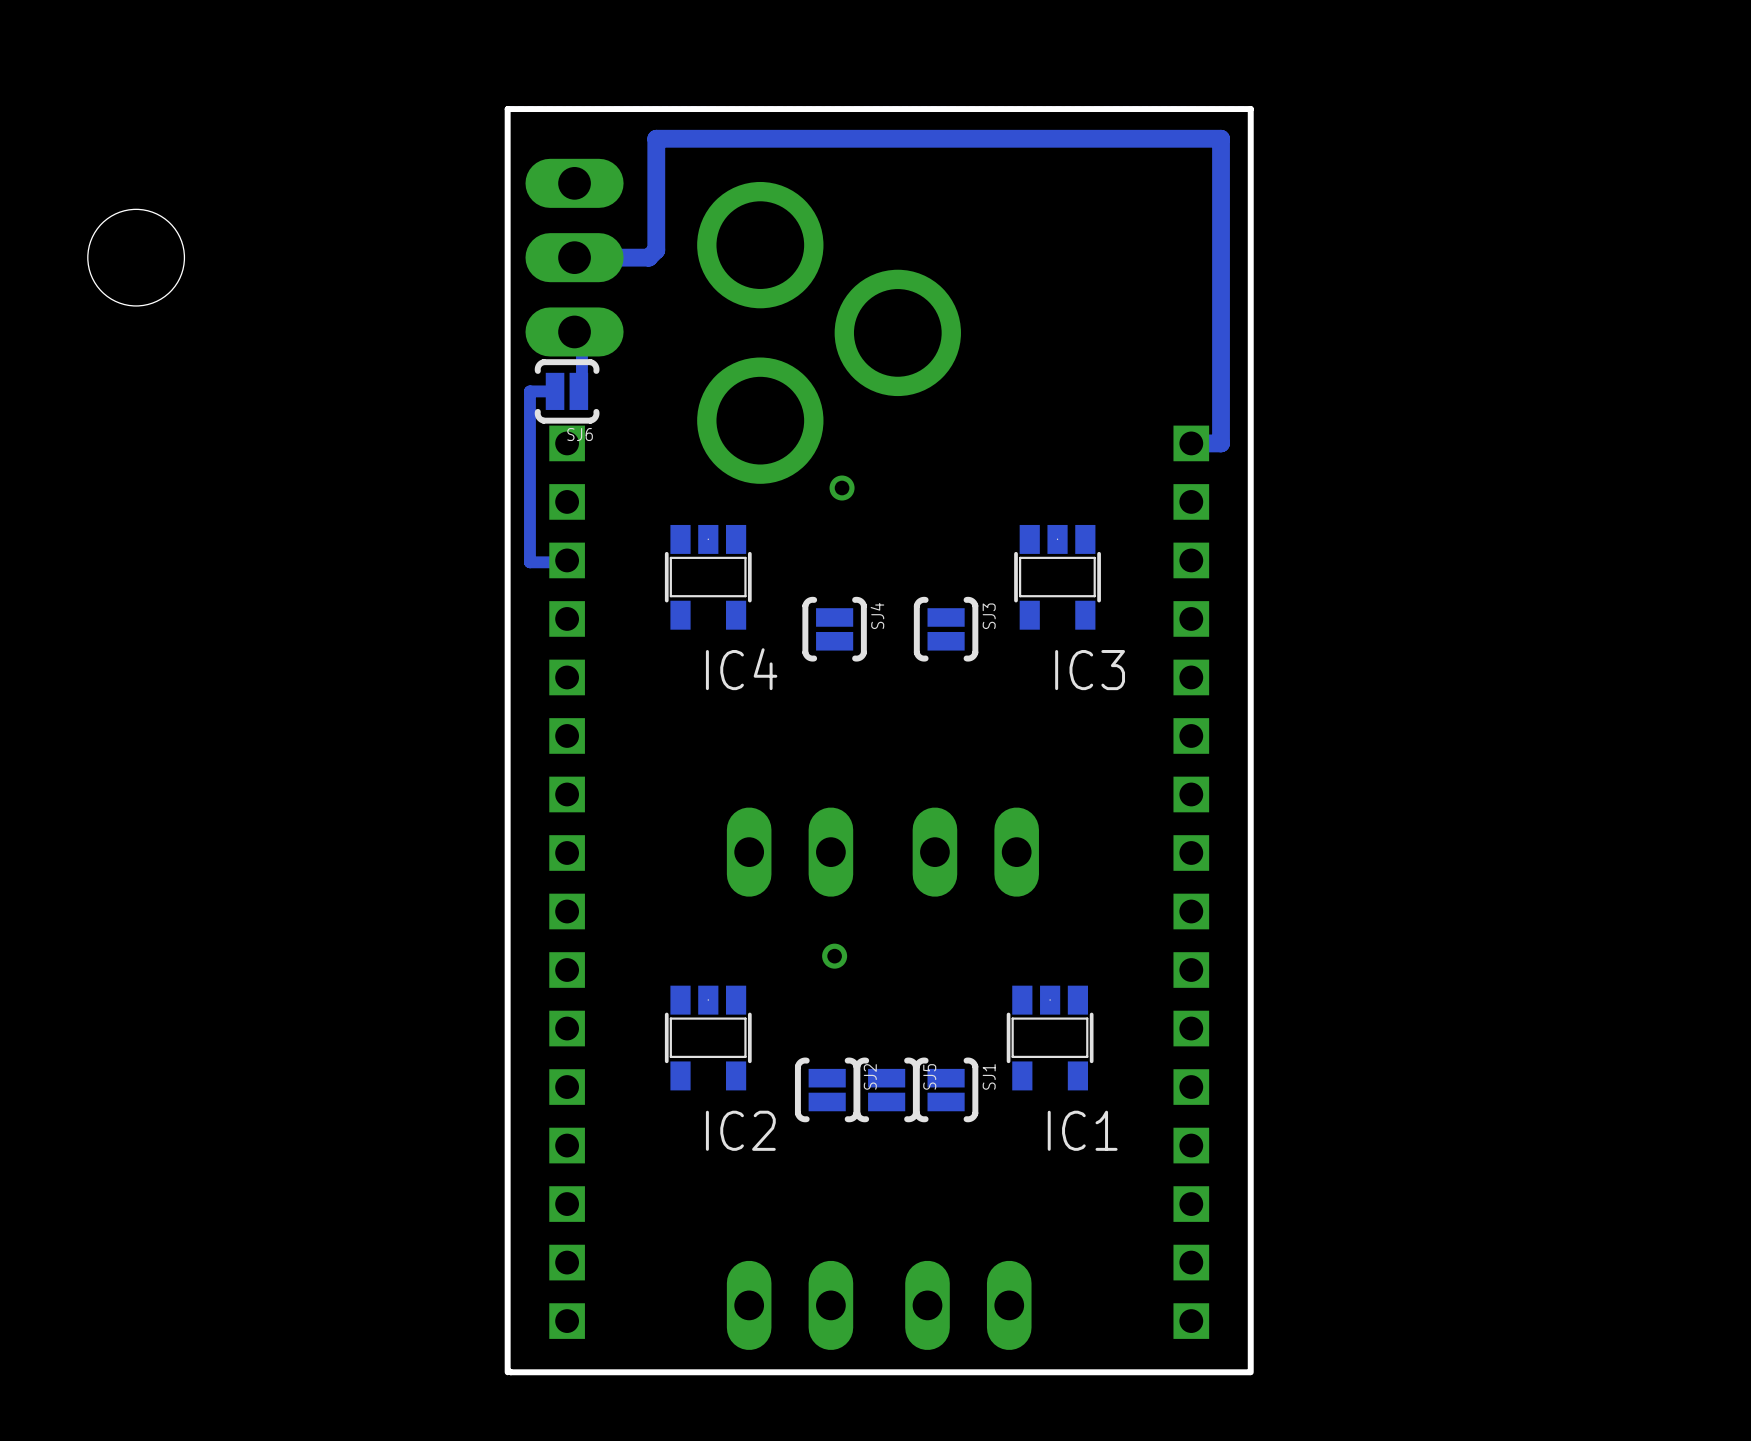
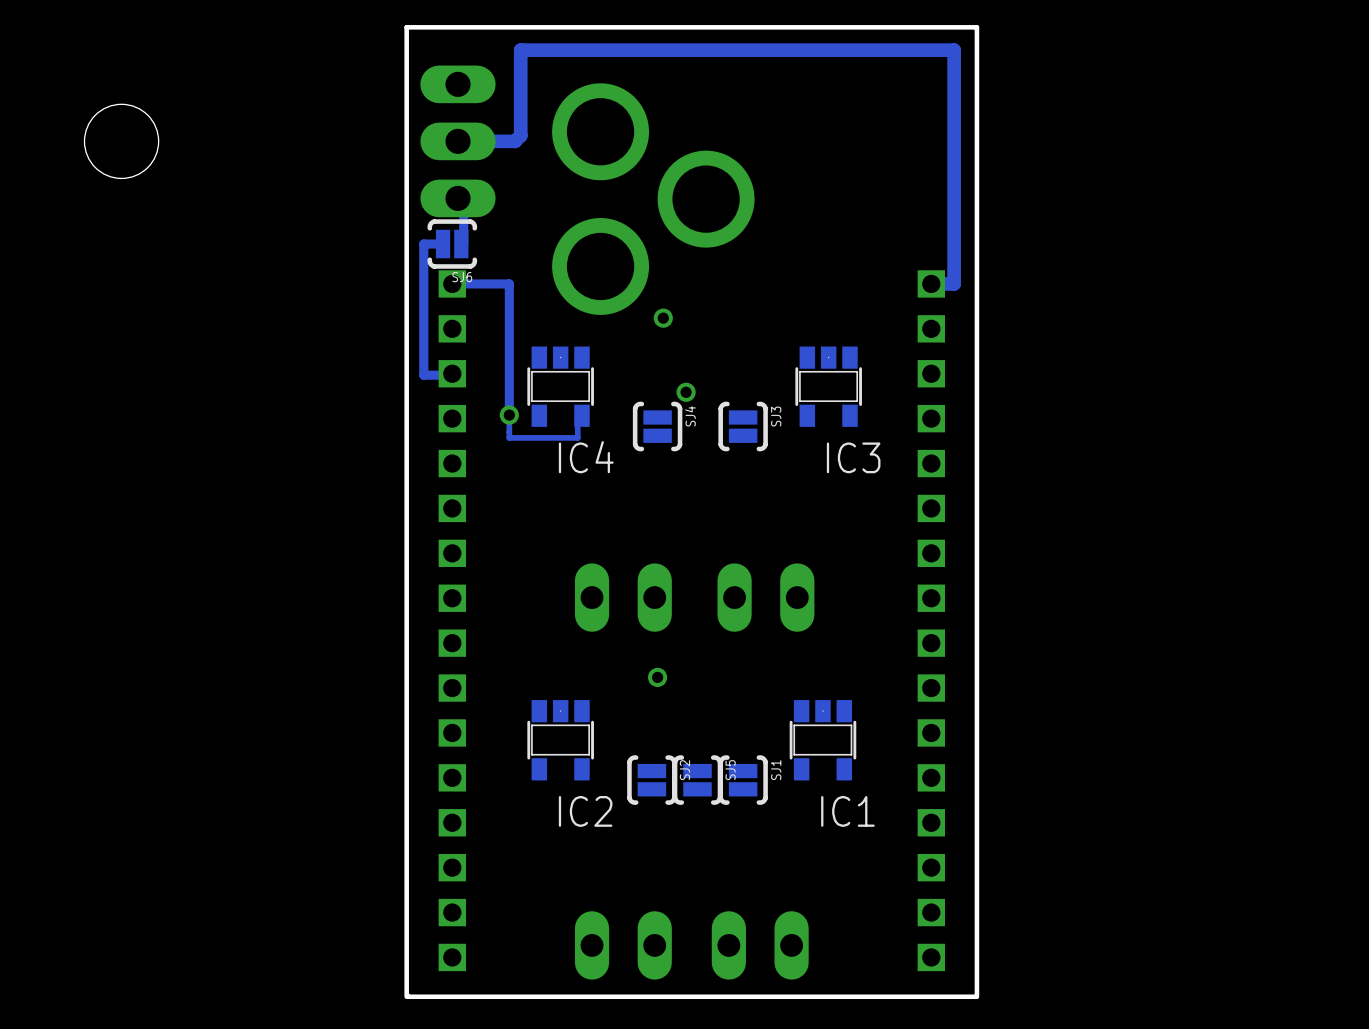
track: none -> (452, 283) (509, 283) (509, 437) (577, 437) (577, 415) (583, 415)
via: none -> (686, 392)
via: none -> (509, 415)

